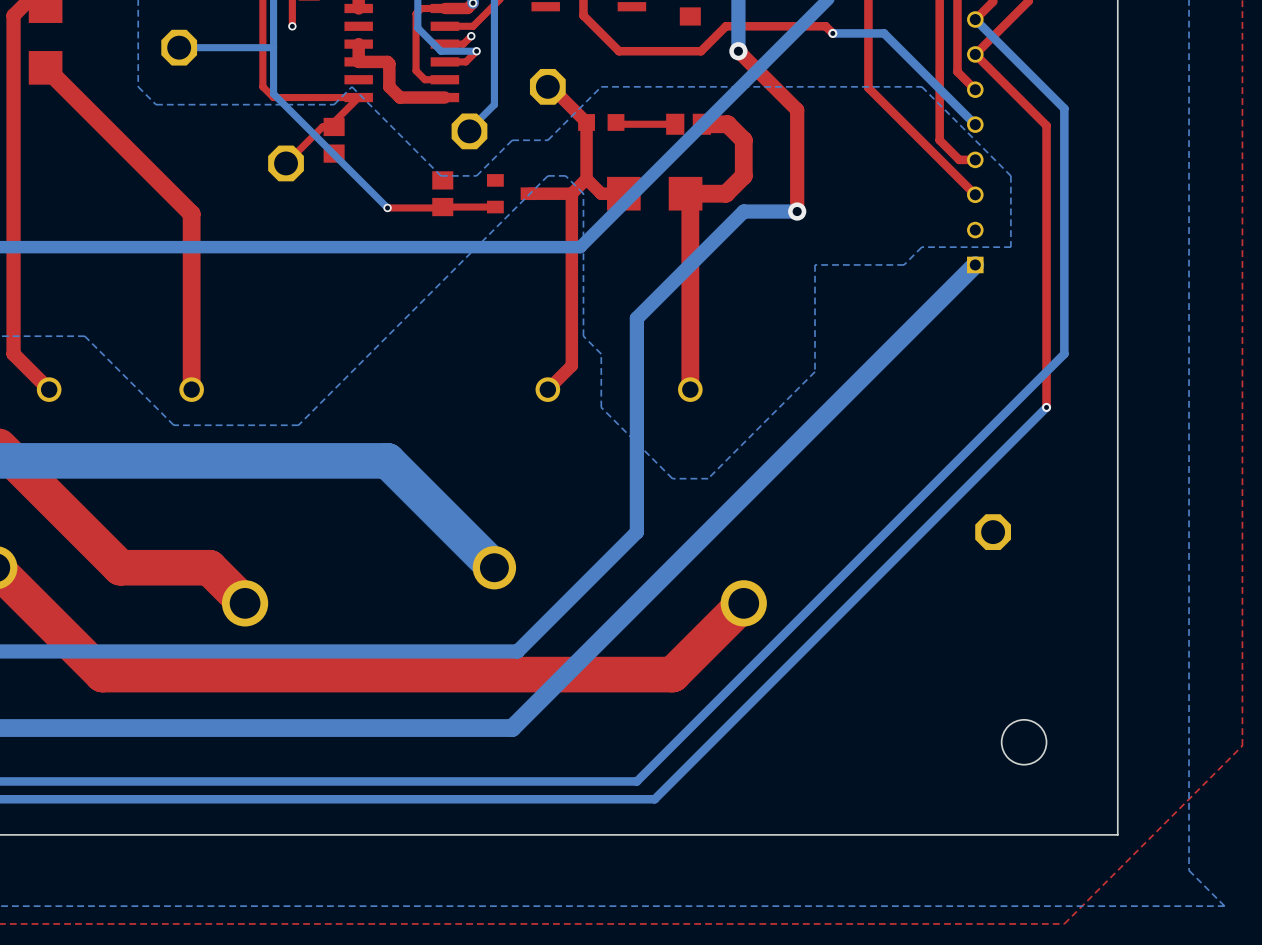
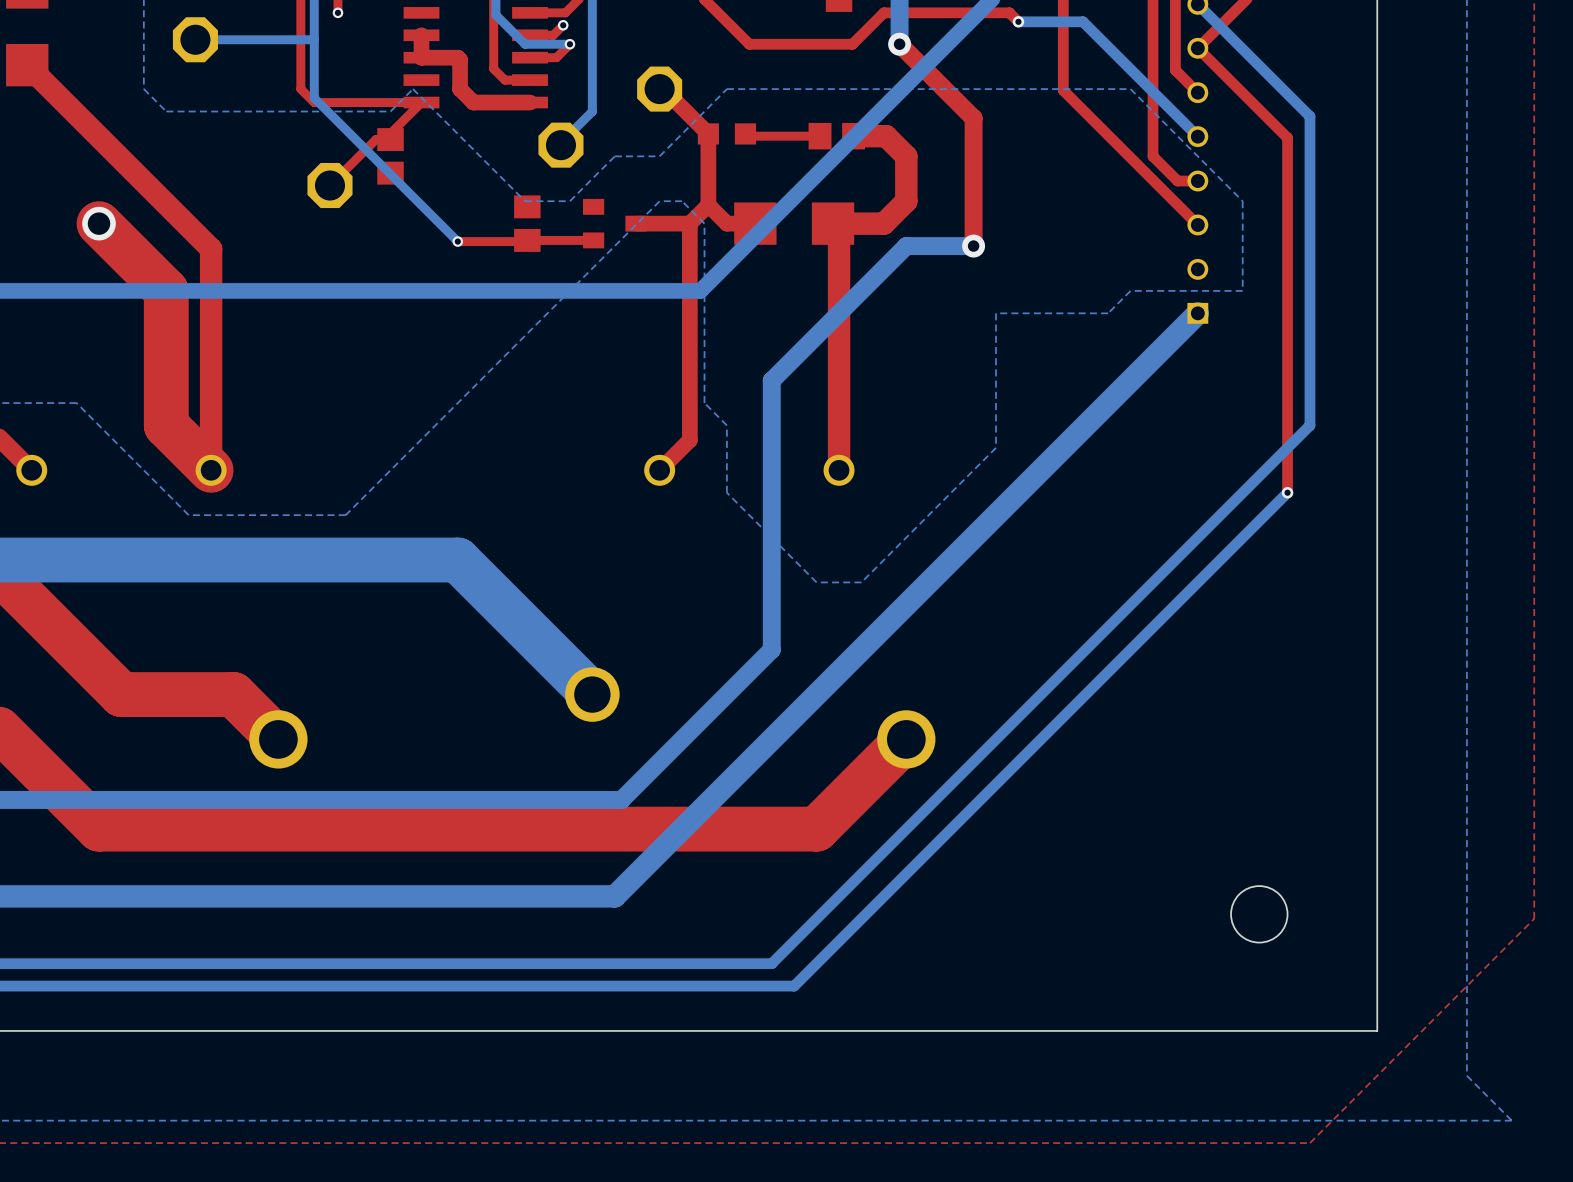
top track: none -> (99, 223) (166, 290) (166, 425) (211, 470)
via: none -> (99, 223)
part: (993, 532) -> none

